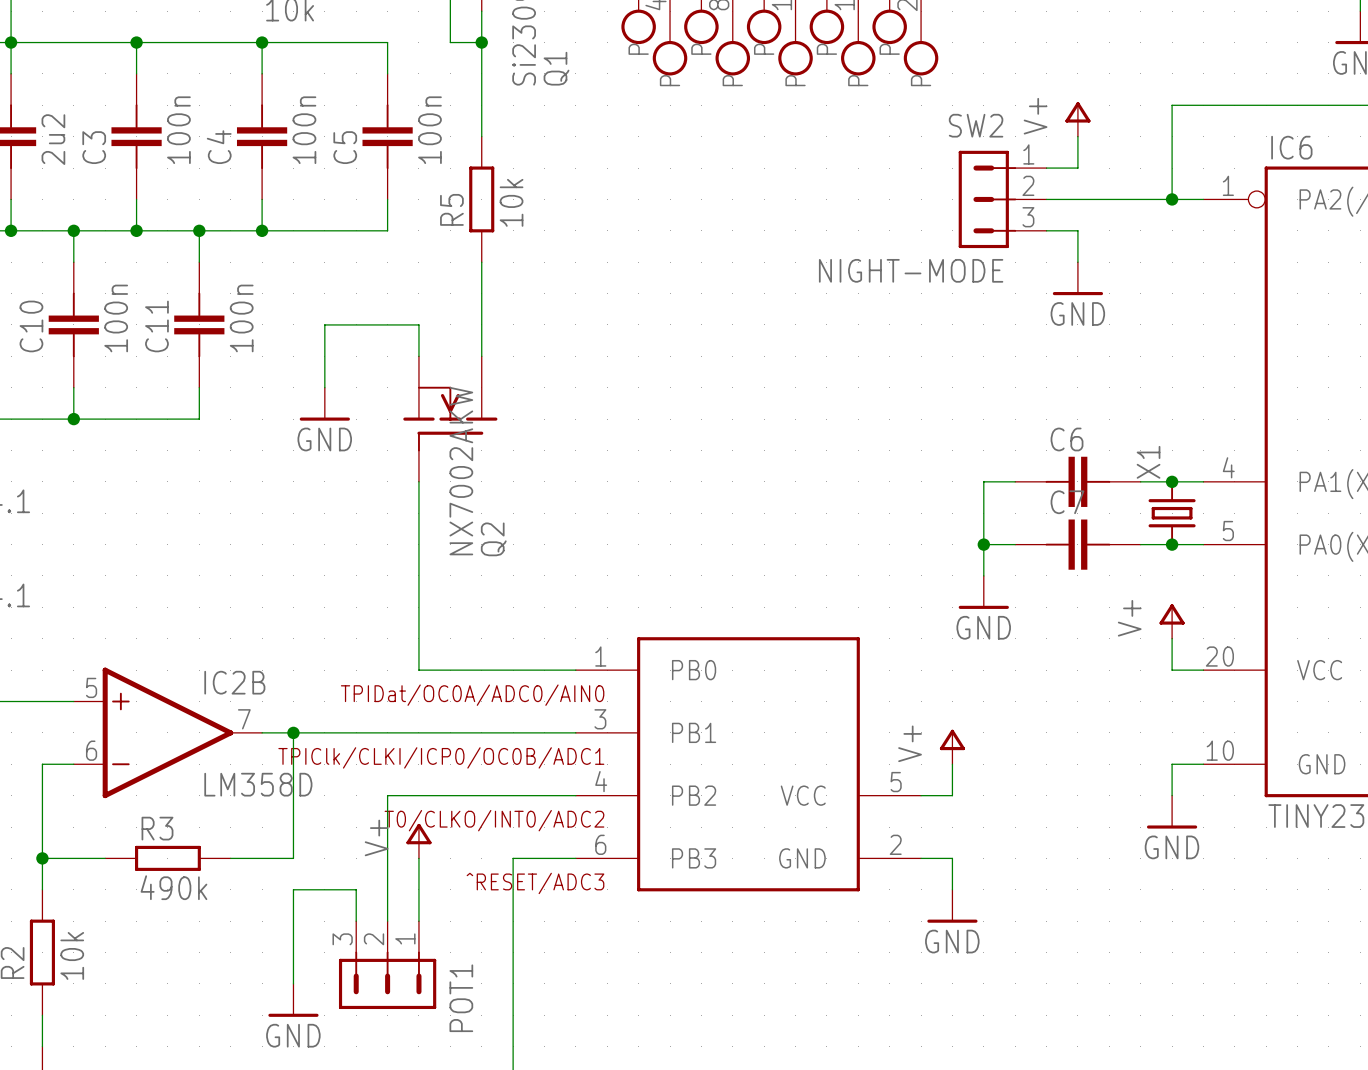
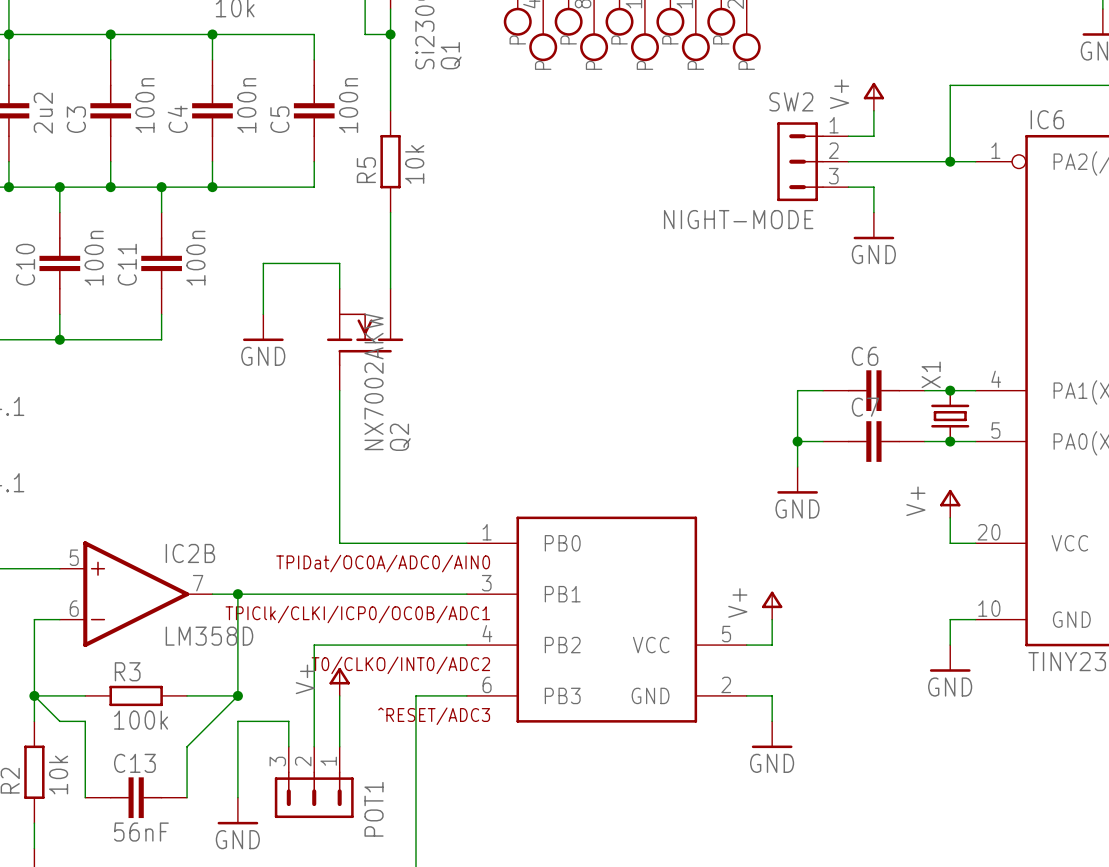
wire: none -> (34, 695) (59, 721) (85, 721) (85, 797)
wire: none -> (237, 695) (187, 746) (187, 797)
junction: none -> (237, 695)
R3 value: 490k (173, 887) -> 100k (141, 720)
C13: none -> 56nF (136, 797)

